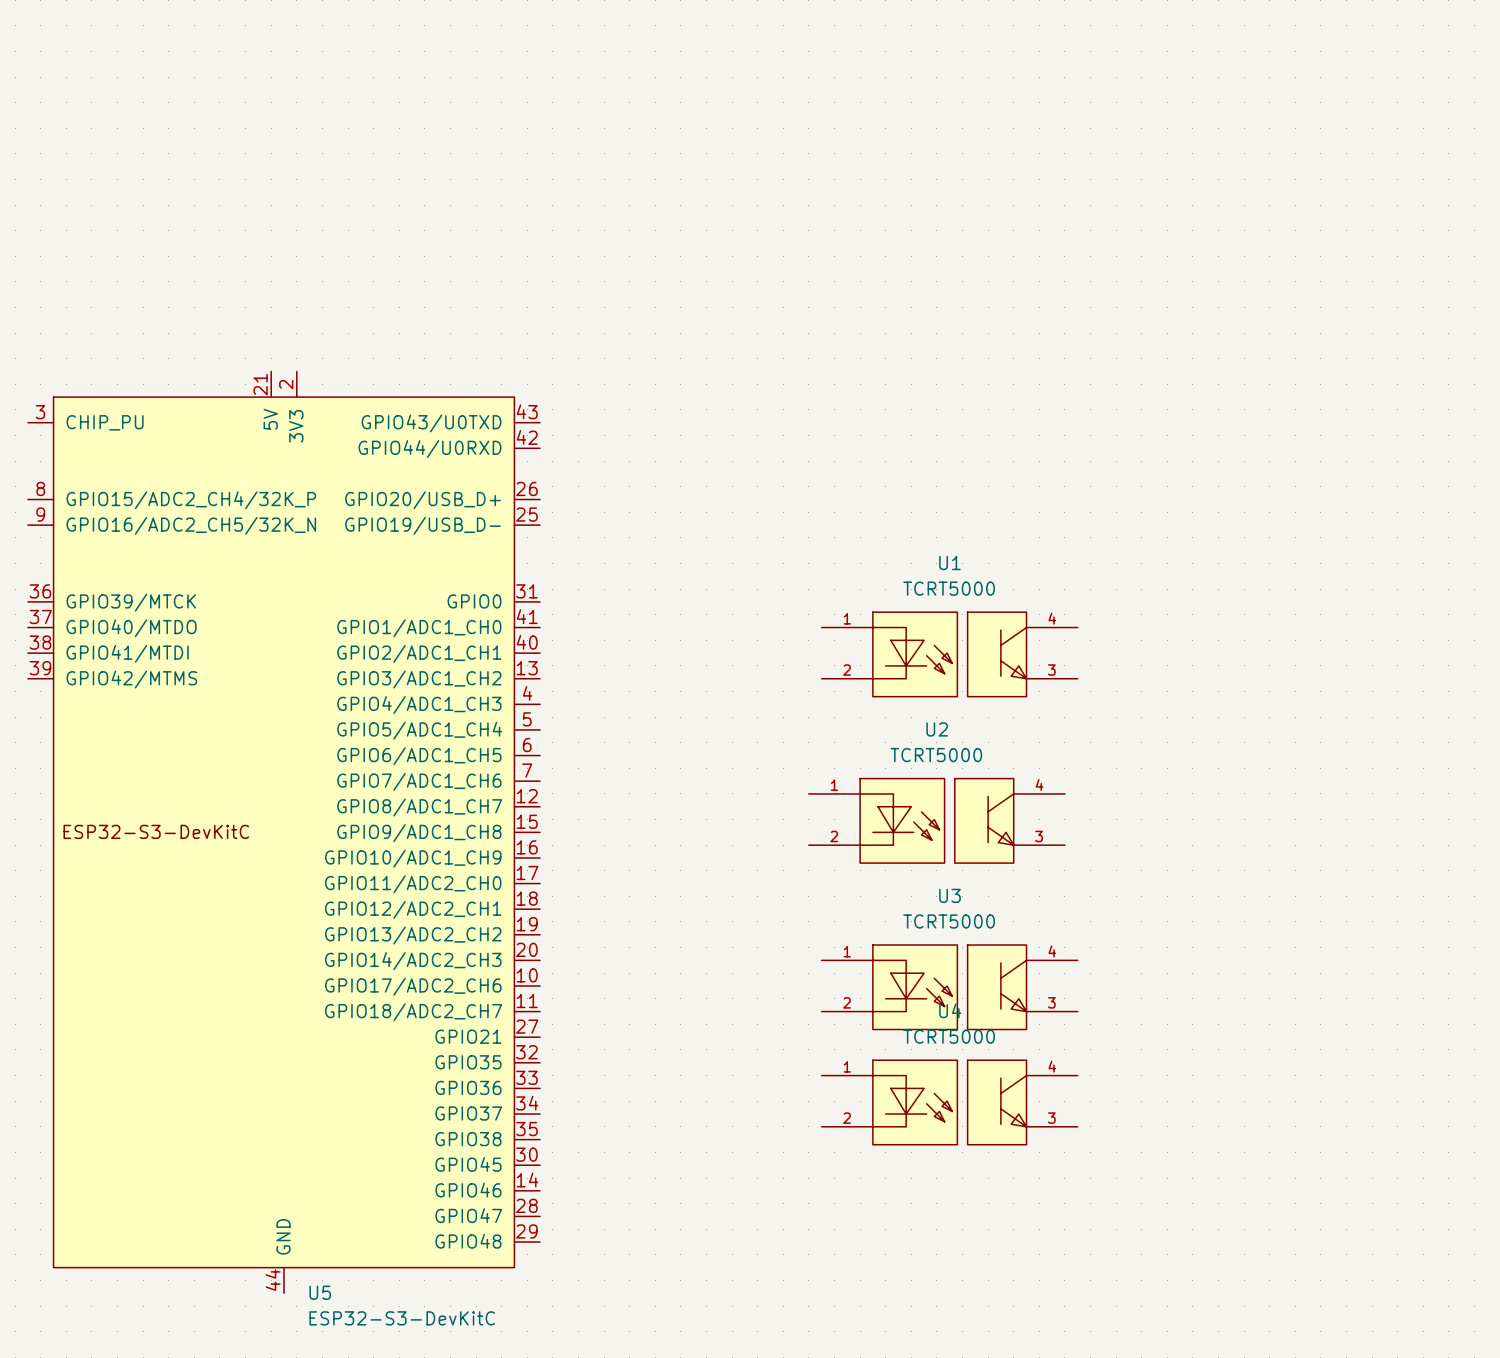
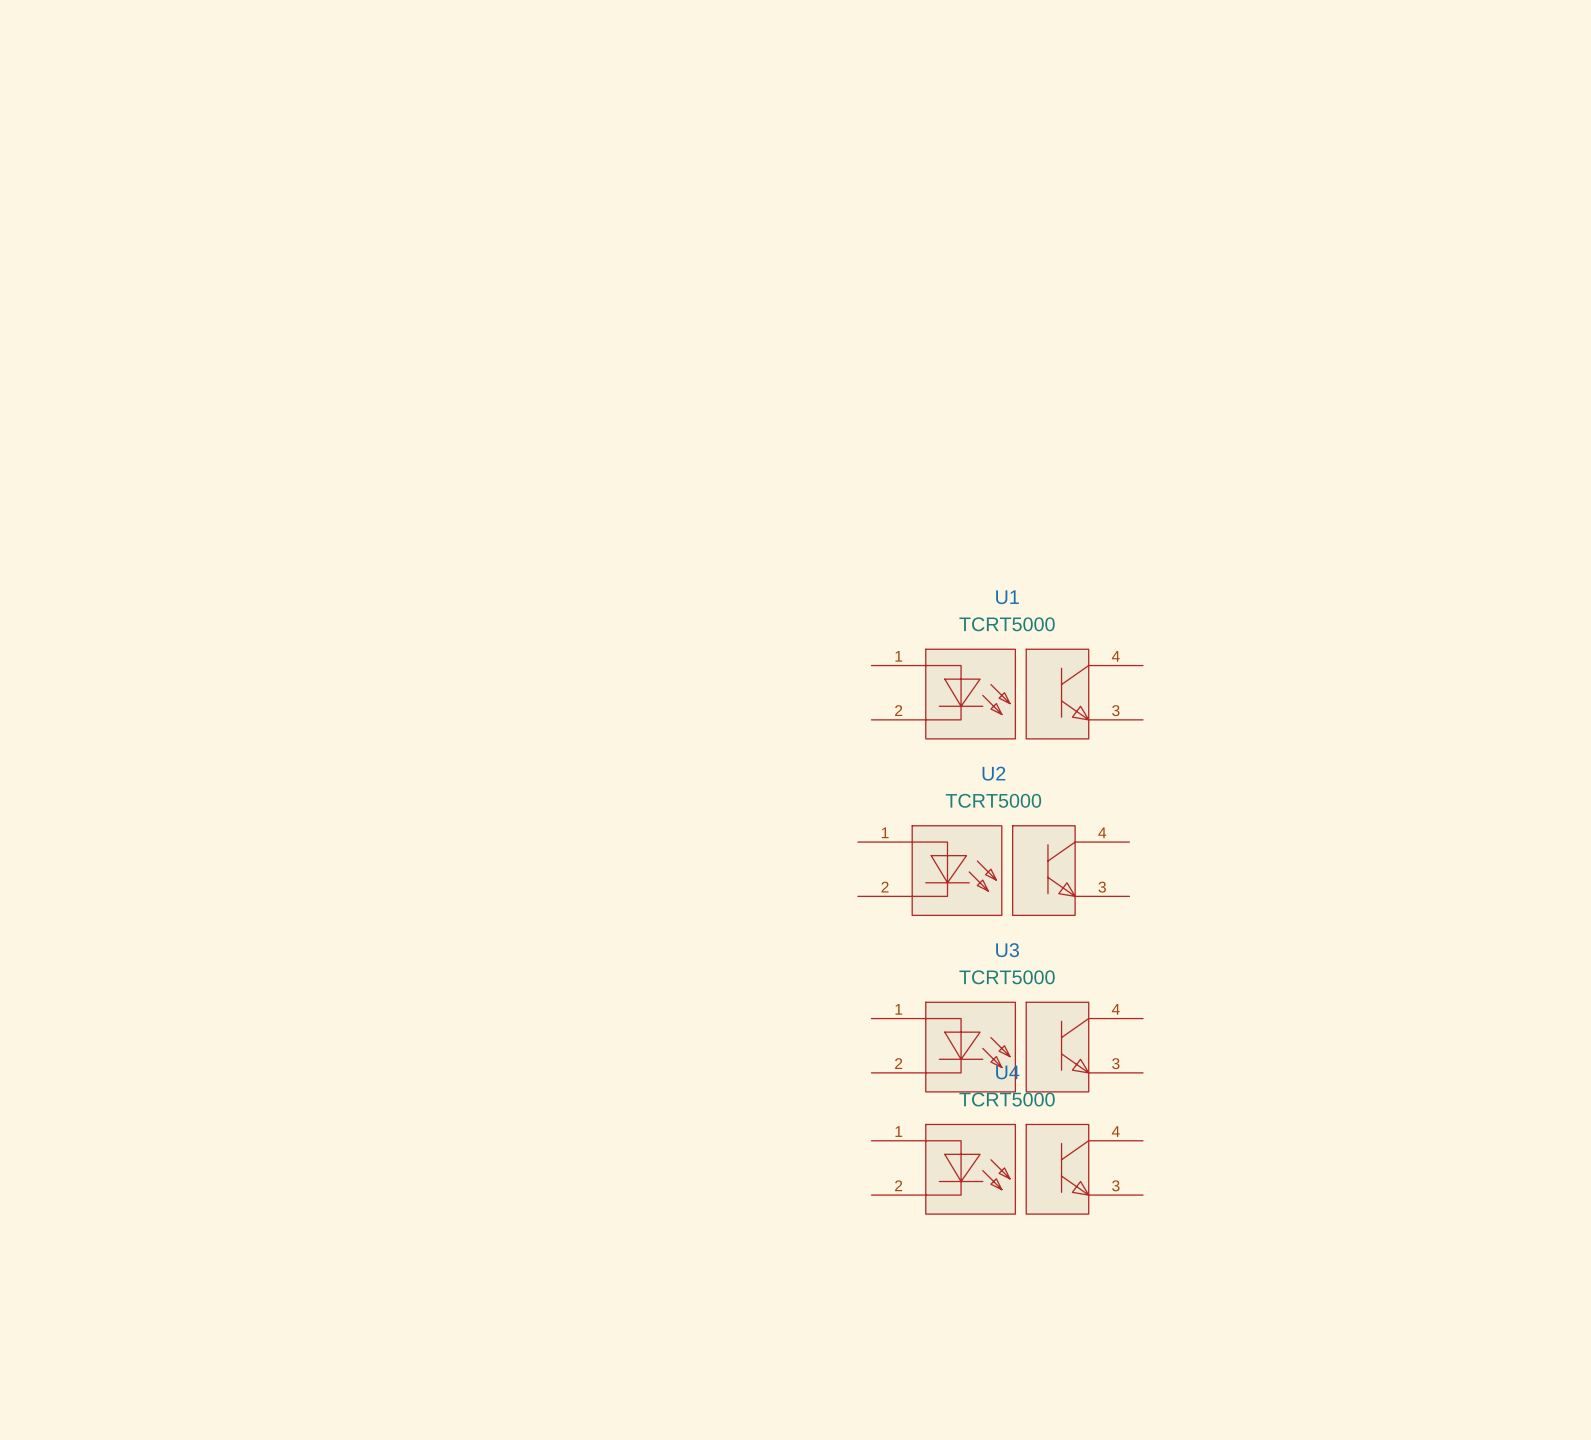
U5: ESP32-S3-DevKitC (283, 832) -> none

